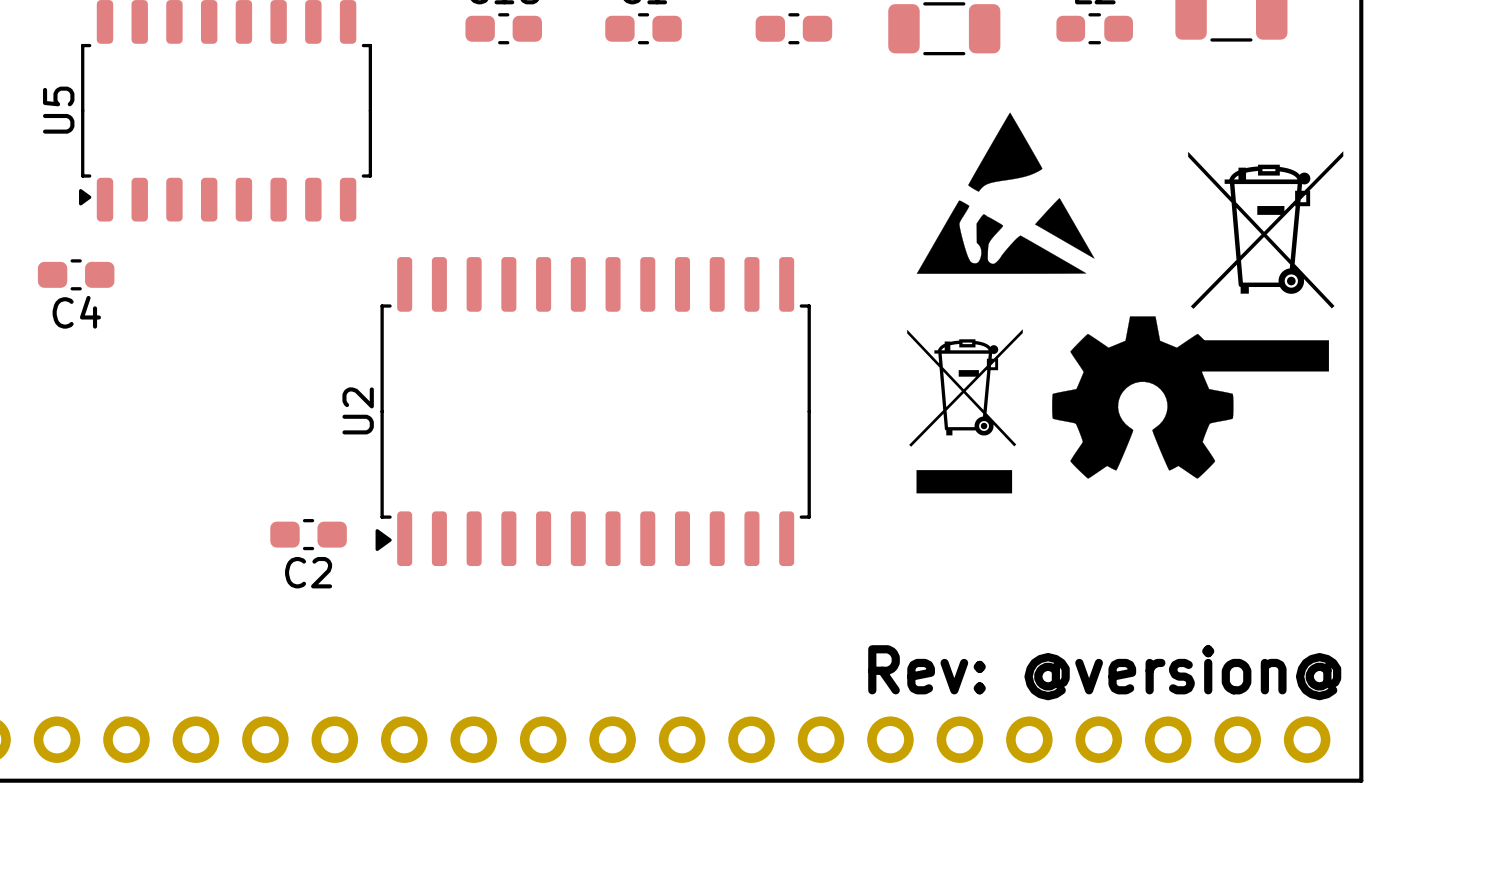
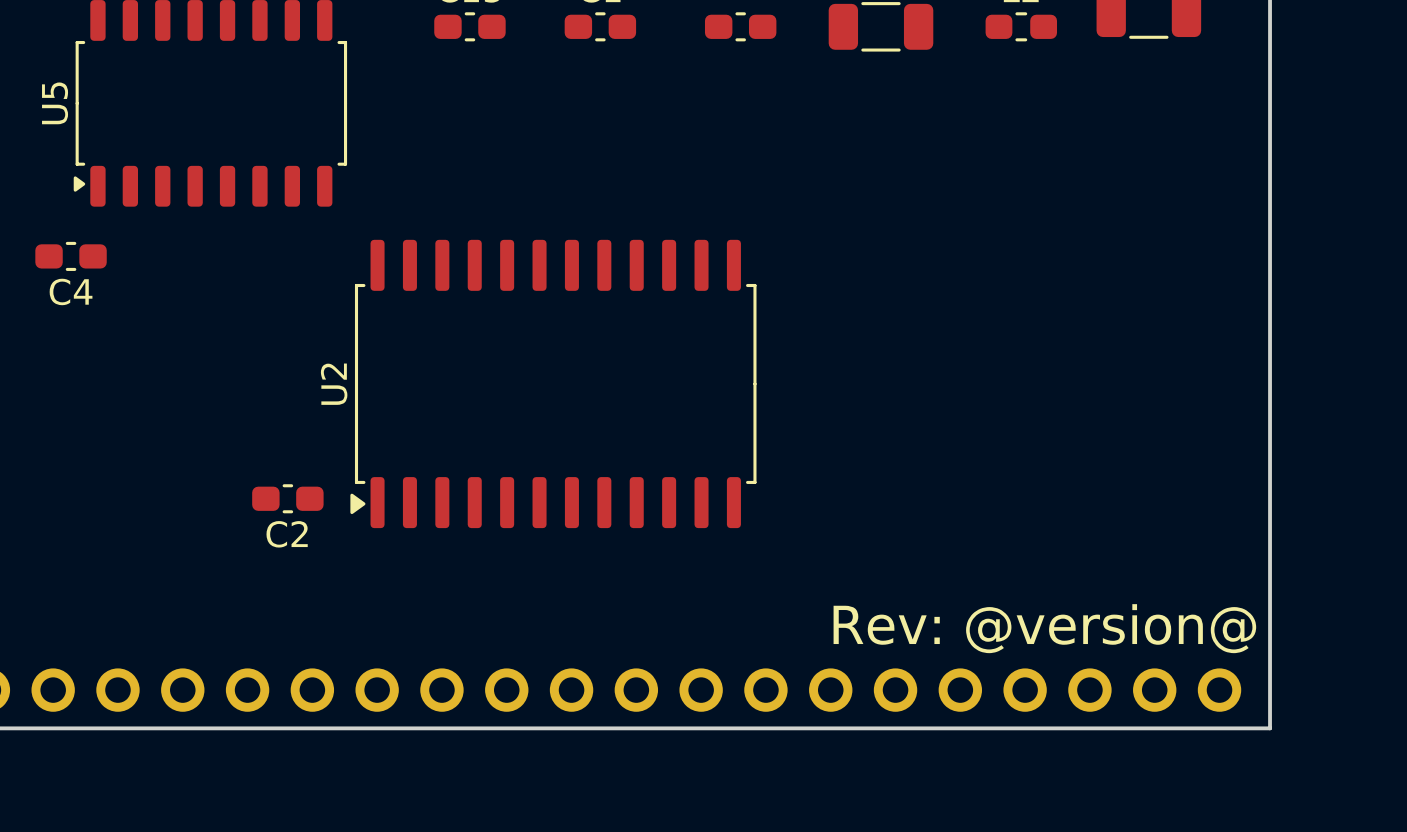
drawing: [916, 112, 1095, 274] -> none
drawing: [907, 151, 1344, 494] -> none

